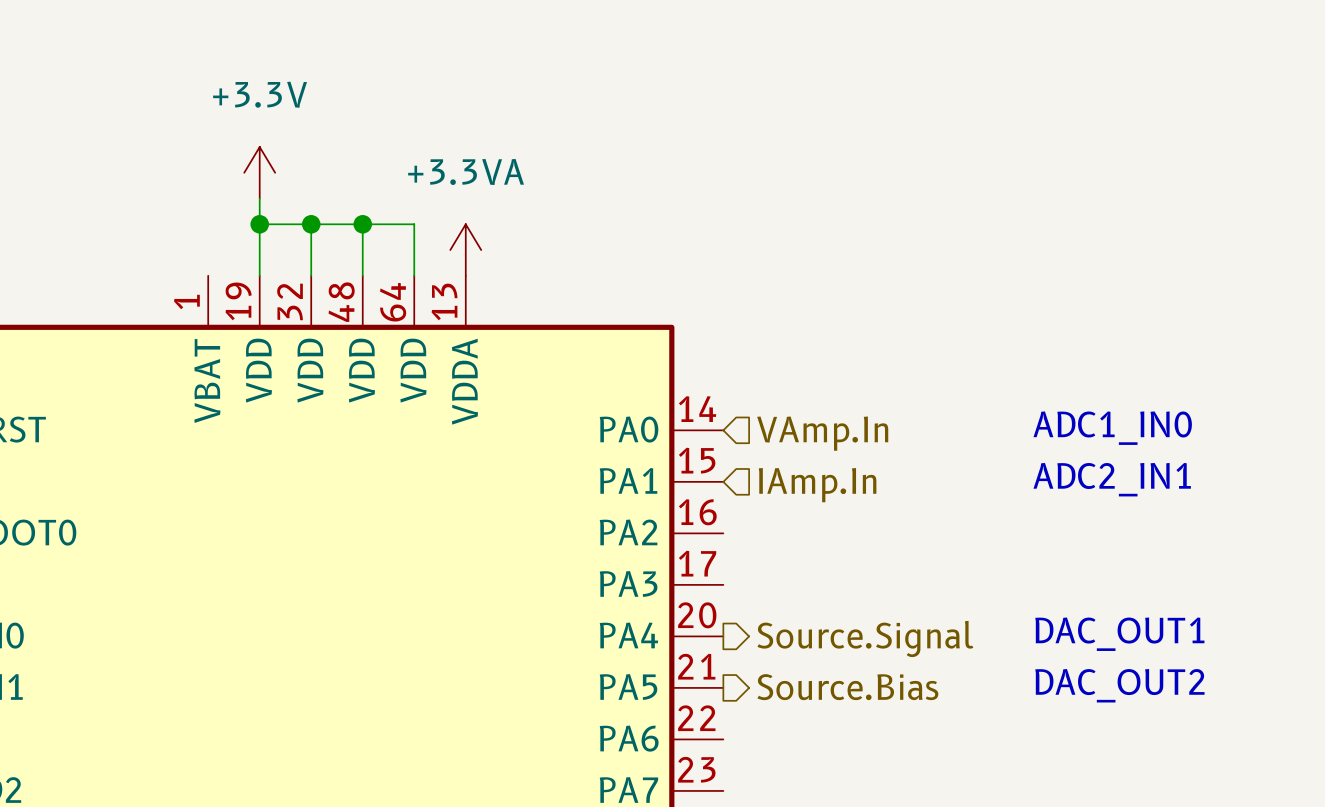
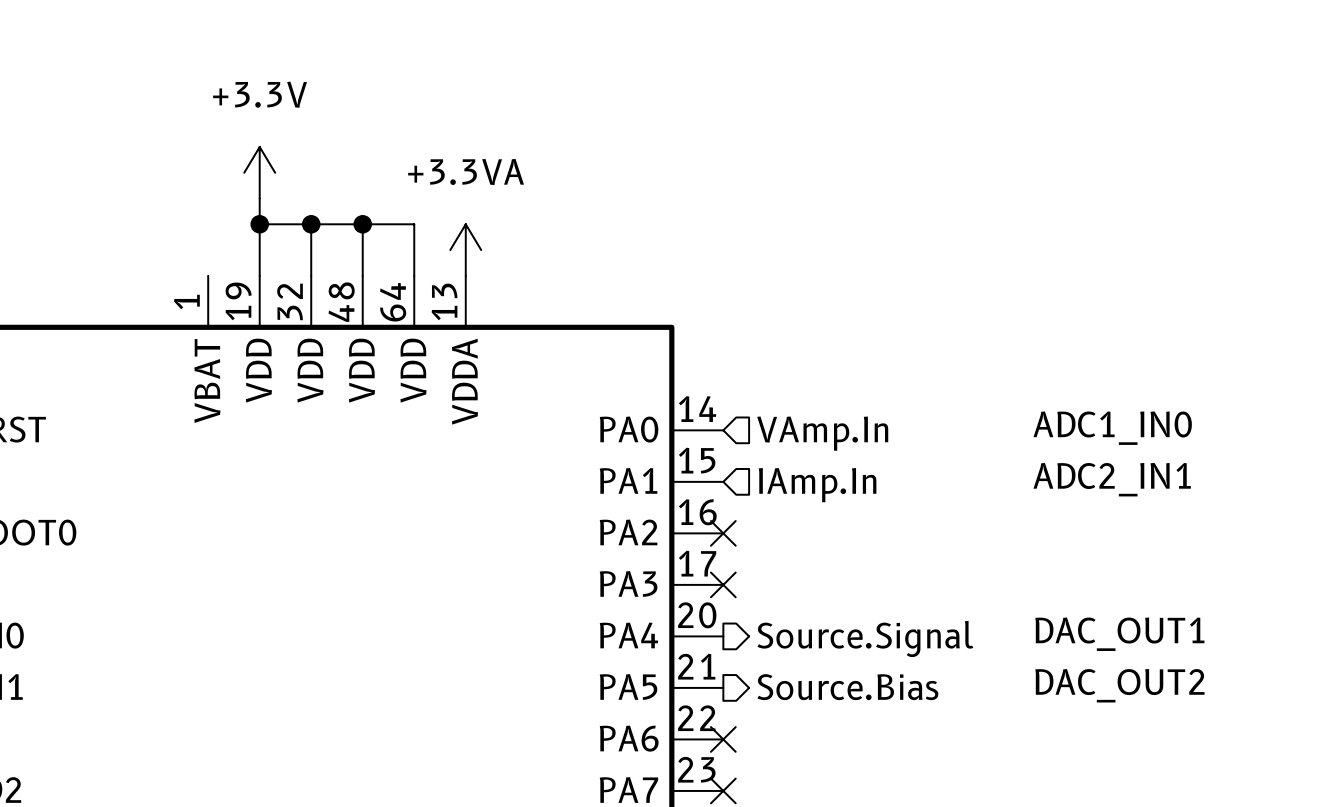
no-connect mark: none -> (723, 533)
no-connect mark: none -> (723, 584)
no-connect mark: none -> (723, 739)
no-connect mark: none -> (723, 790)

